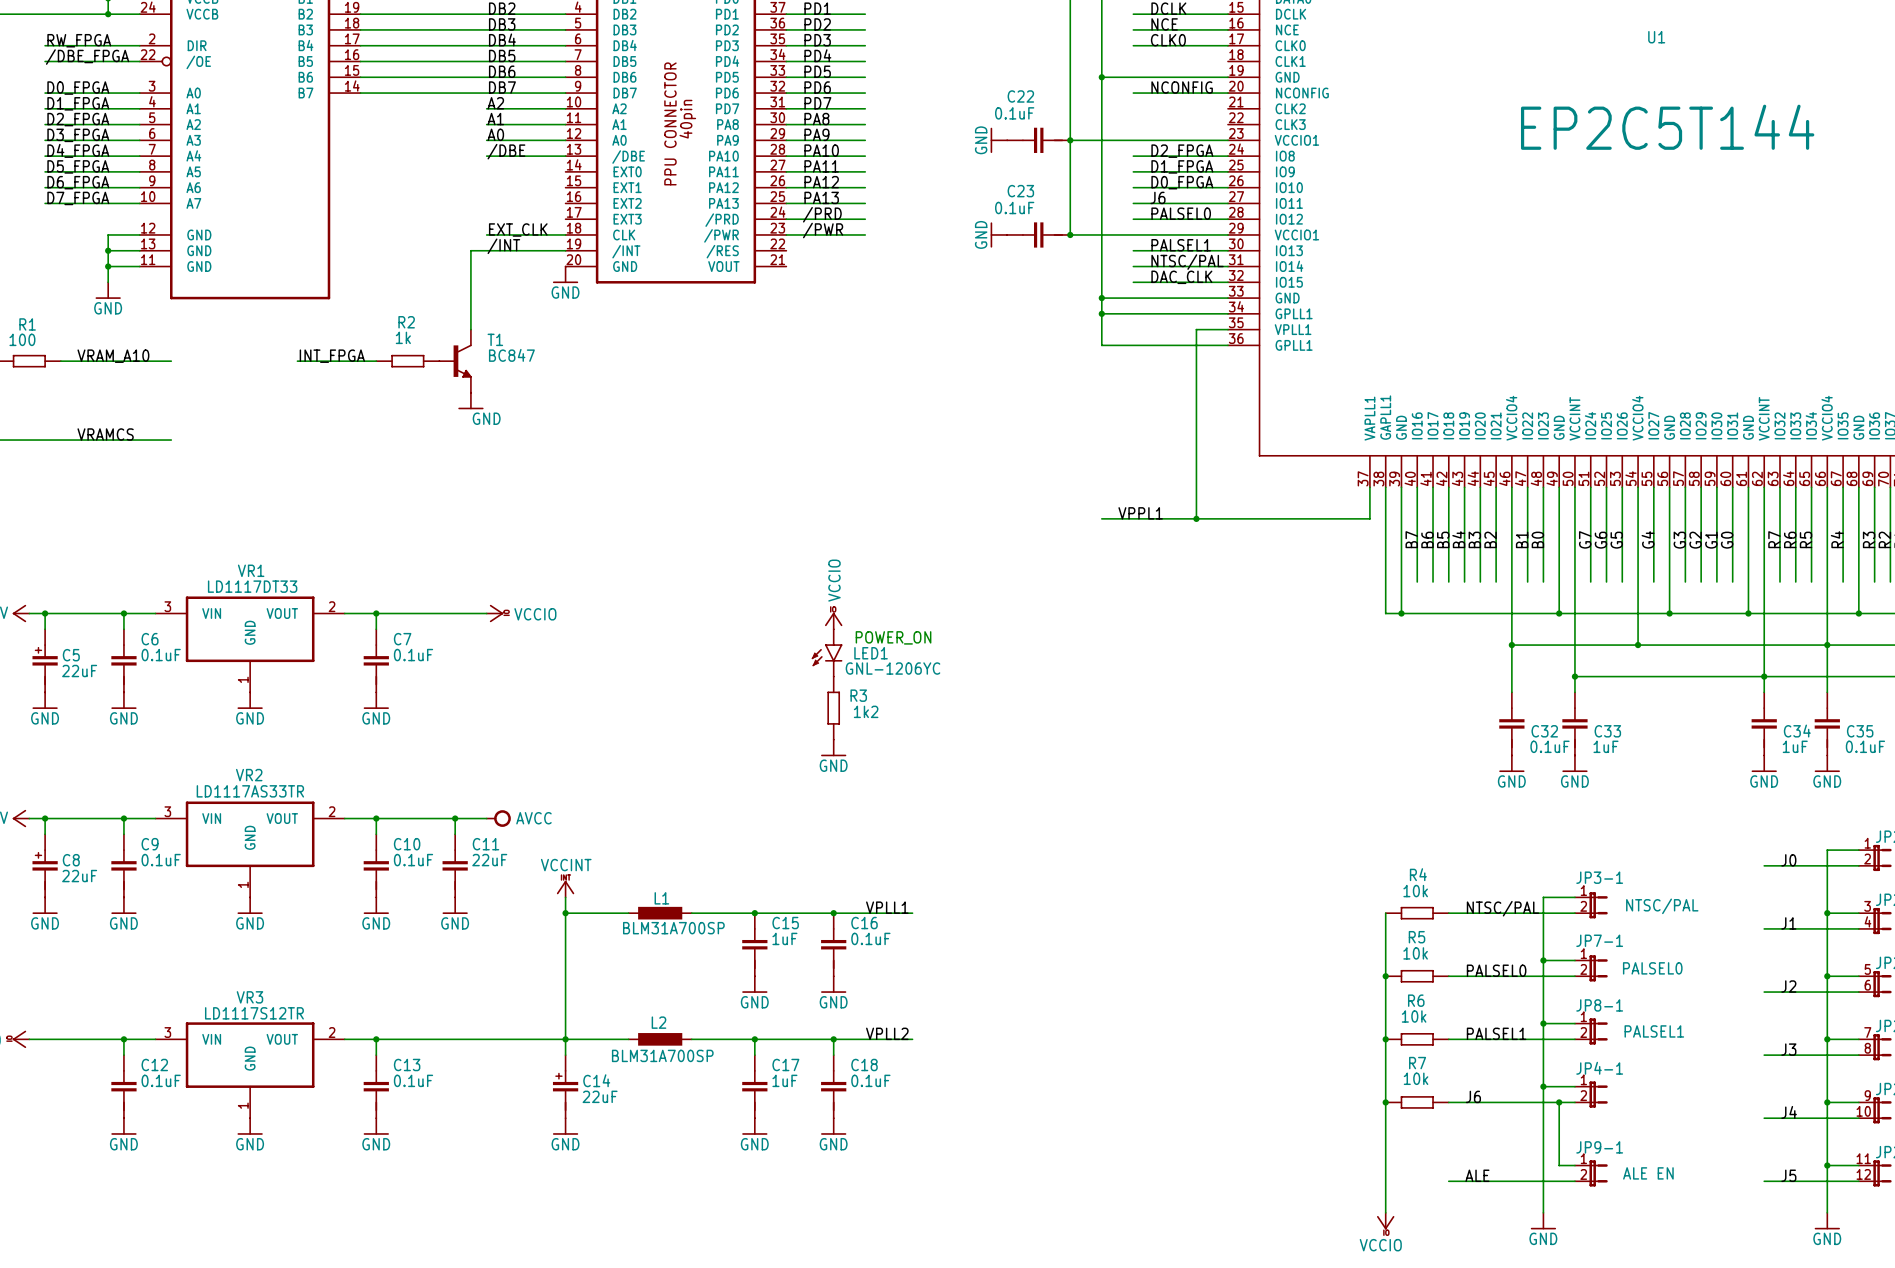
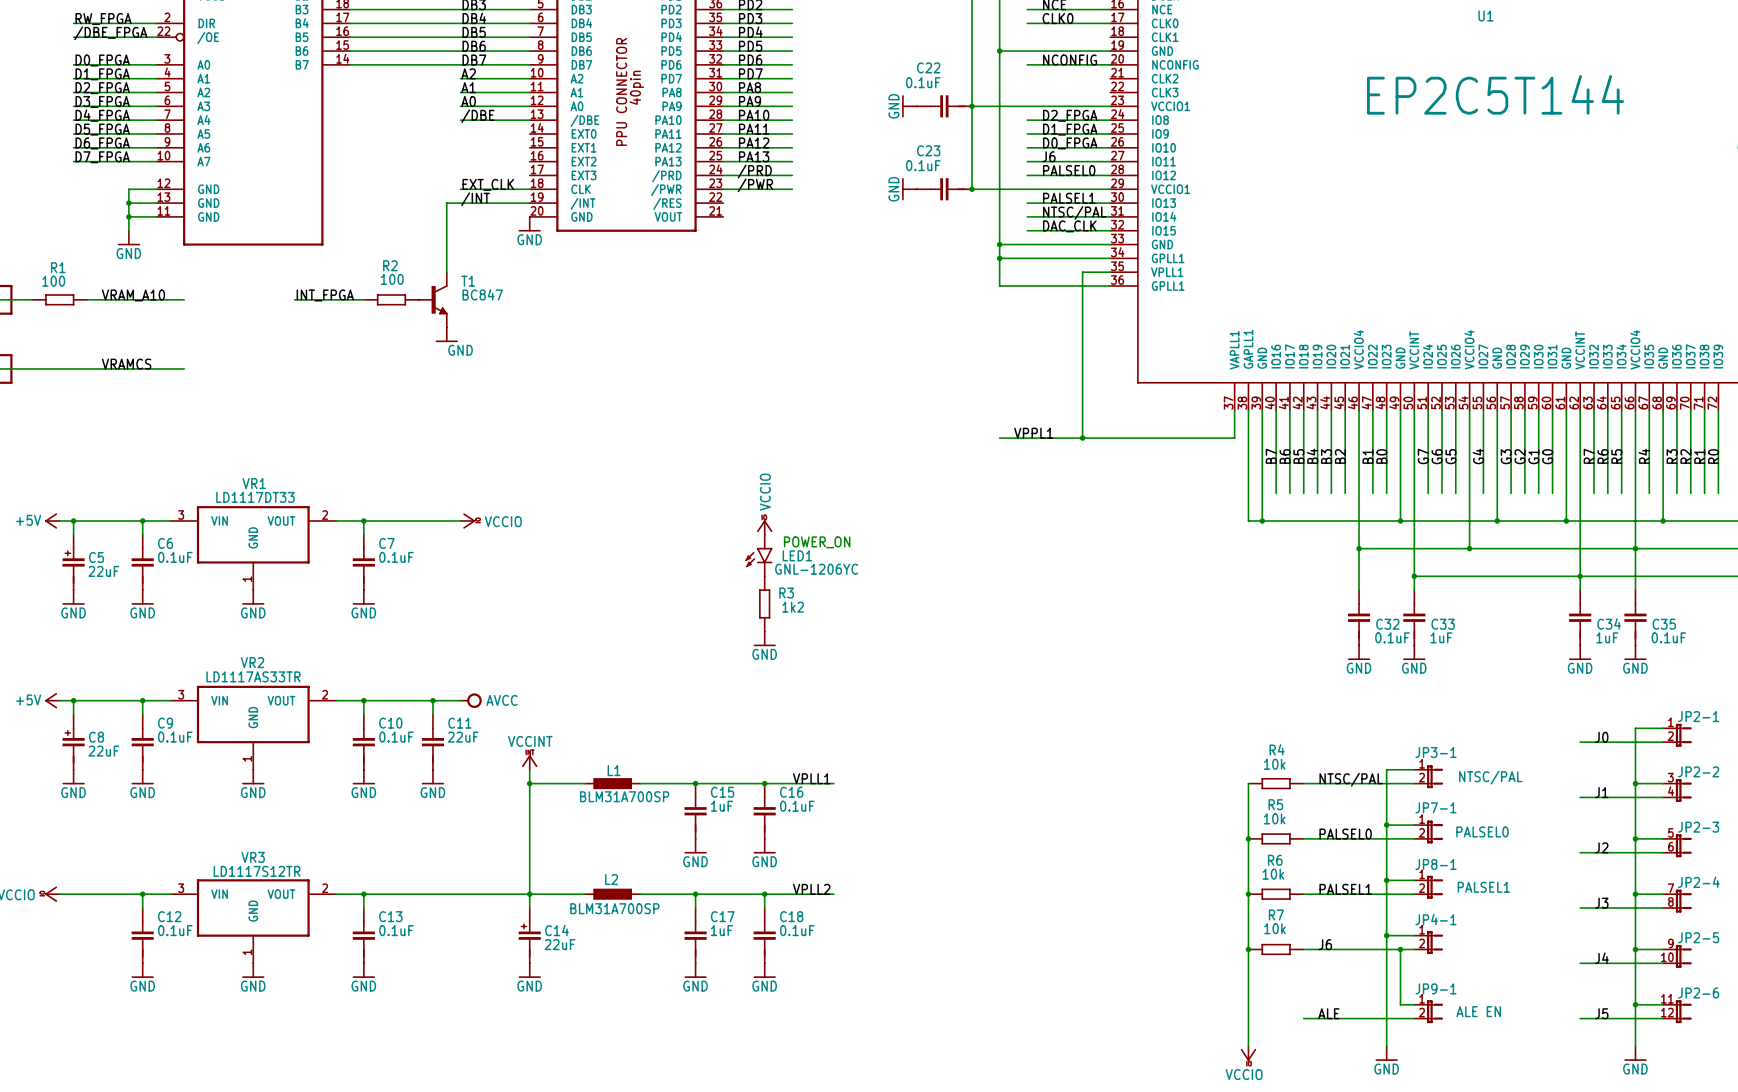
R2 value: 1k (403, 337) -> 100 (392, 279)

